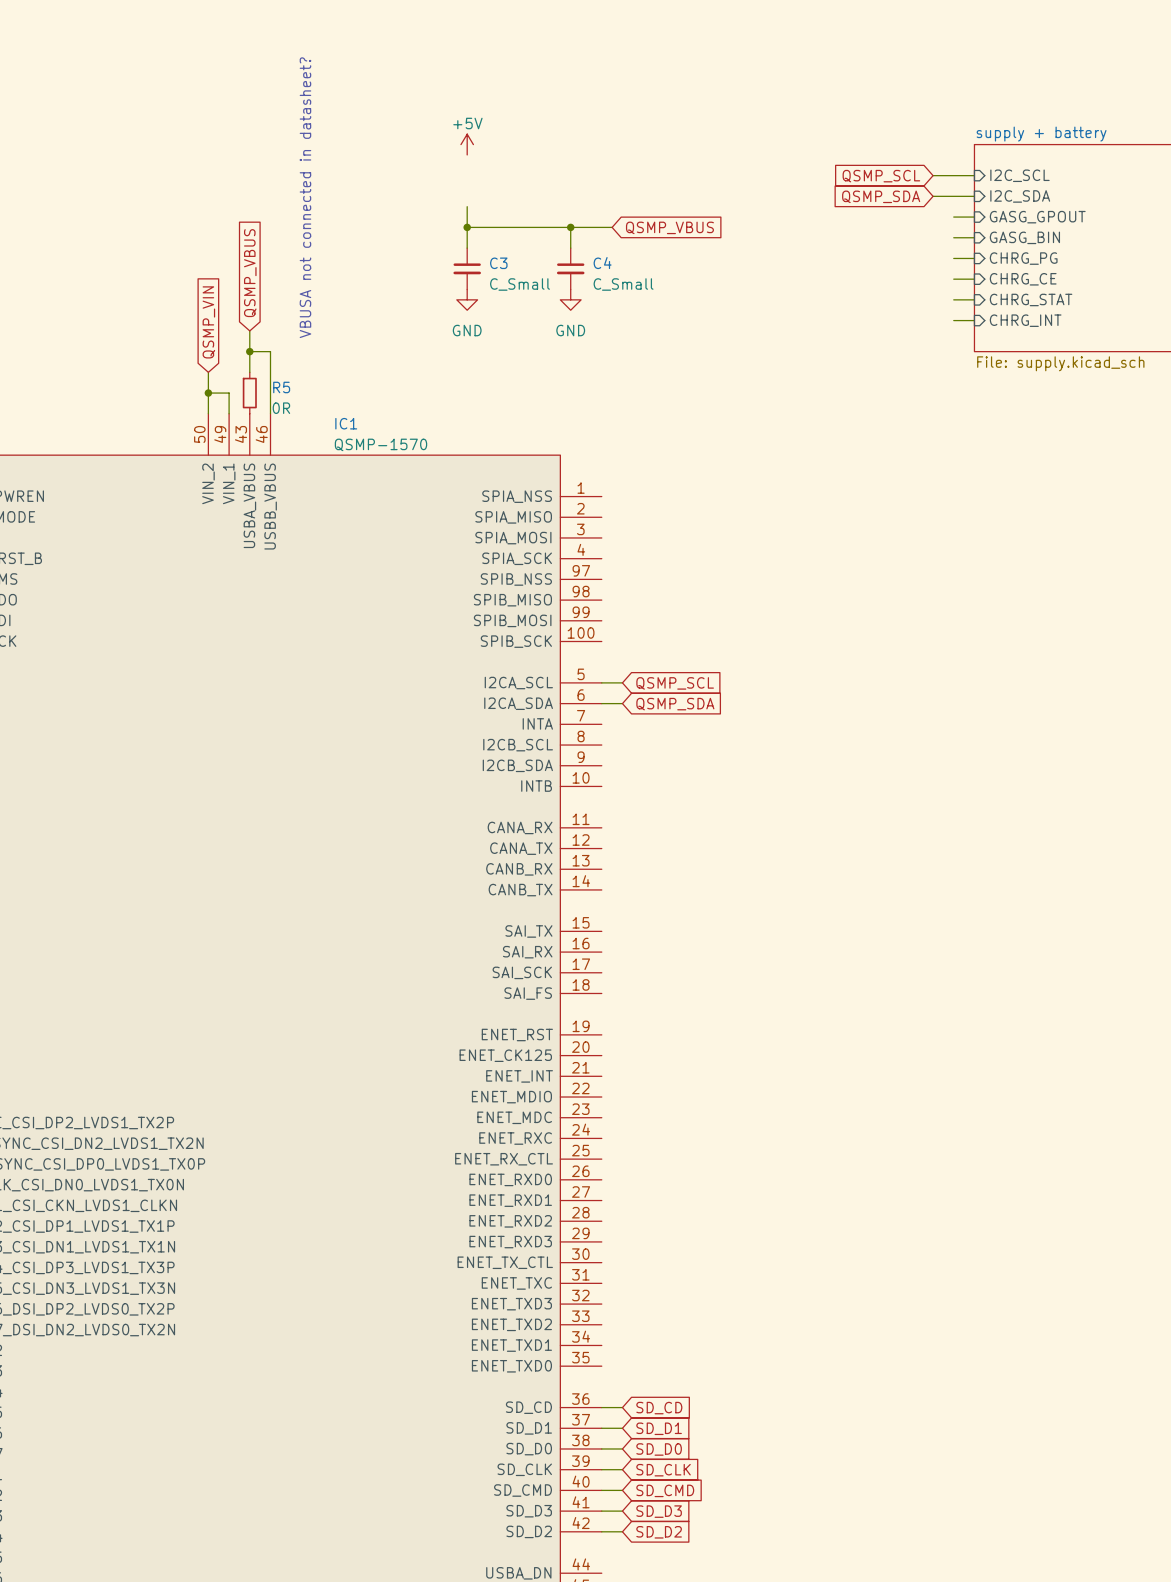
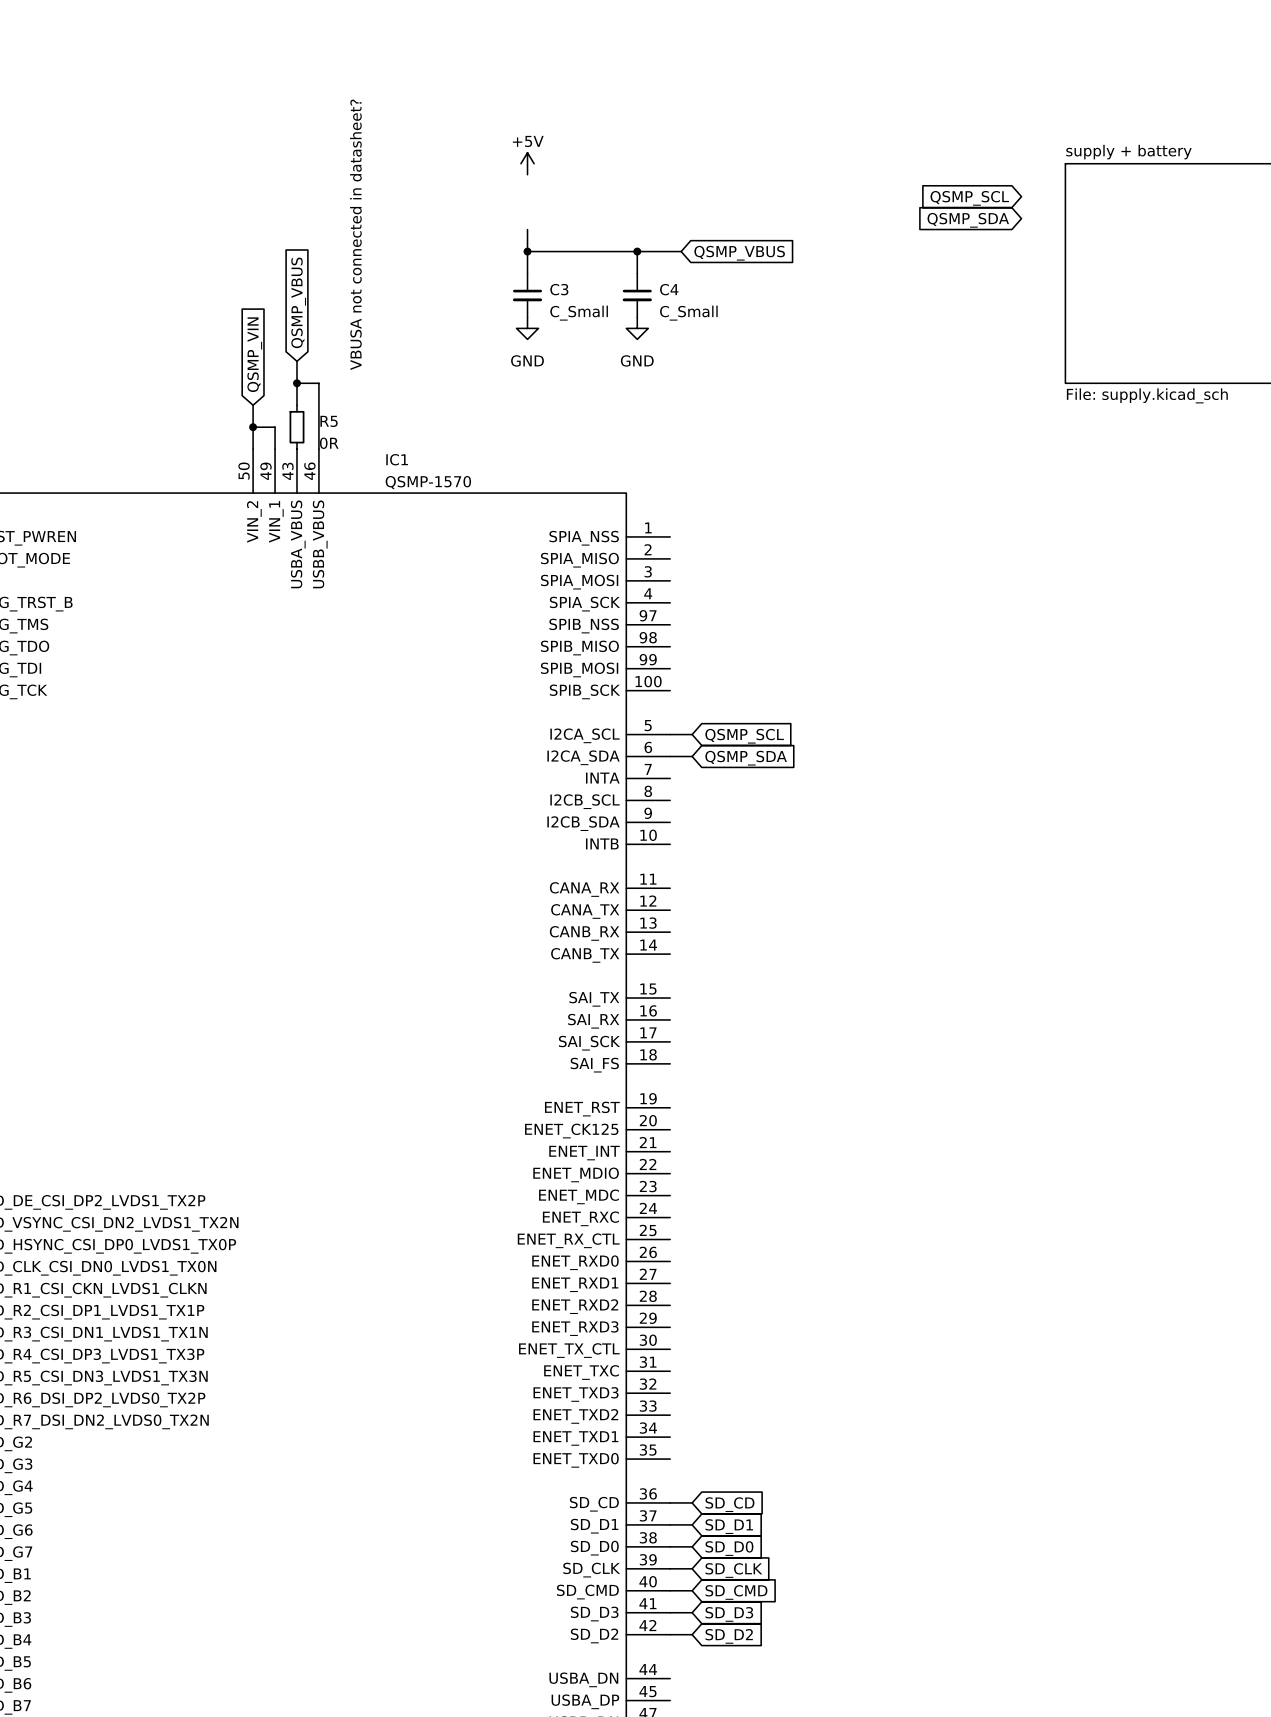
wire: (933, 175) (974, 175) -> none
sheet pin: I2C_SCL (1019, 175) -> none
wire: (933, 196) (974, 196) -> none
sheet pin: I2C_SDA (1020, 196) -> none
wire: (953, 217) (974, 217) -> none
sheet pin: GASG_GPOUT (1037, 217) -> none
wire: (953, 237) (974, 237) -> none
sheet pin: GASG_BIN (1024, 237) -> none
wire: (953, 258) (974, 258) -> none
sheet pin: CHRG_PG (1023, 258) -> none
wire: (953, 279) (974, 279) -> none
sheet pin: CHRG_CE (1023, 279) -> none
wire: (953, 299) (974, 299) -> none
sheet pin: CHRG_STAT (1031, 299) -> none
wire: (953, 320) (974, 320) -> none
sheet pin: CHRG_INT (1025, 320) -> none

